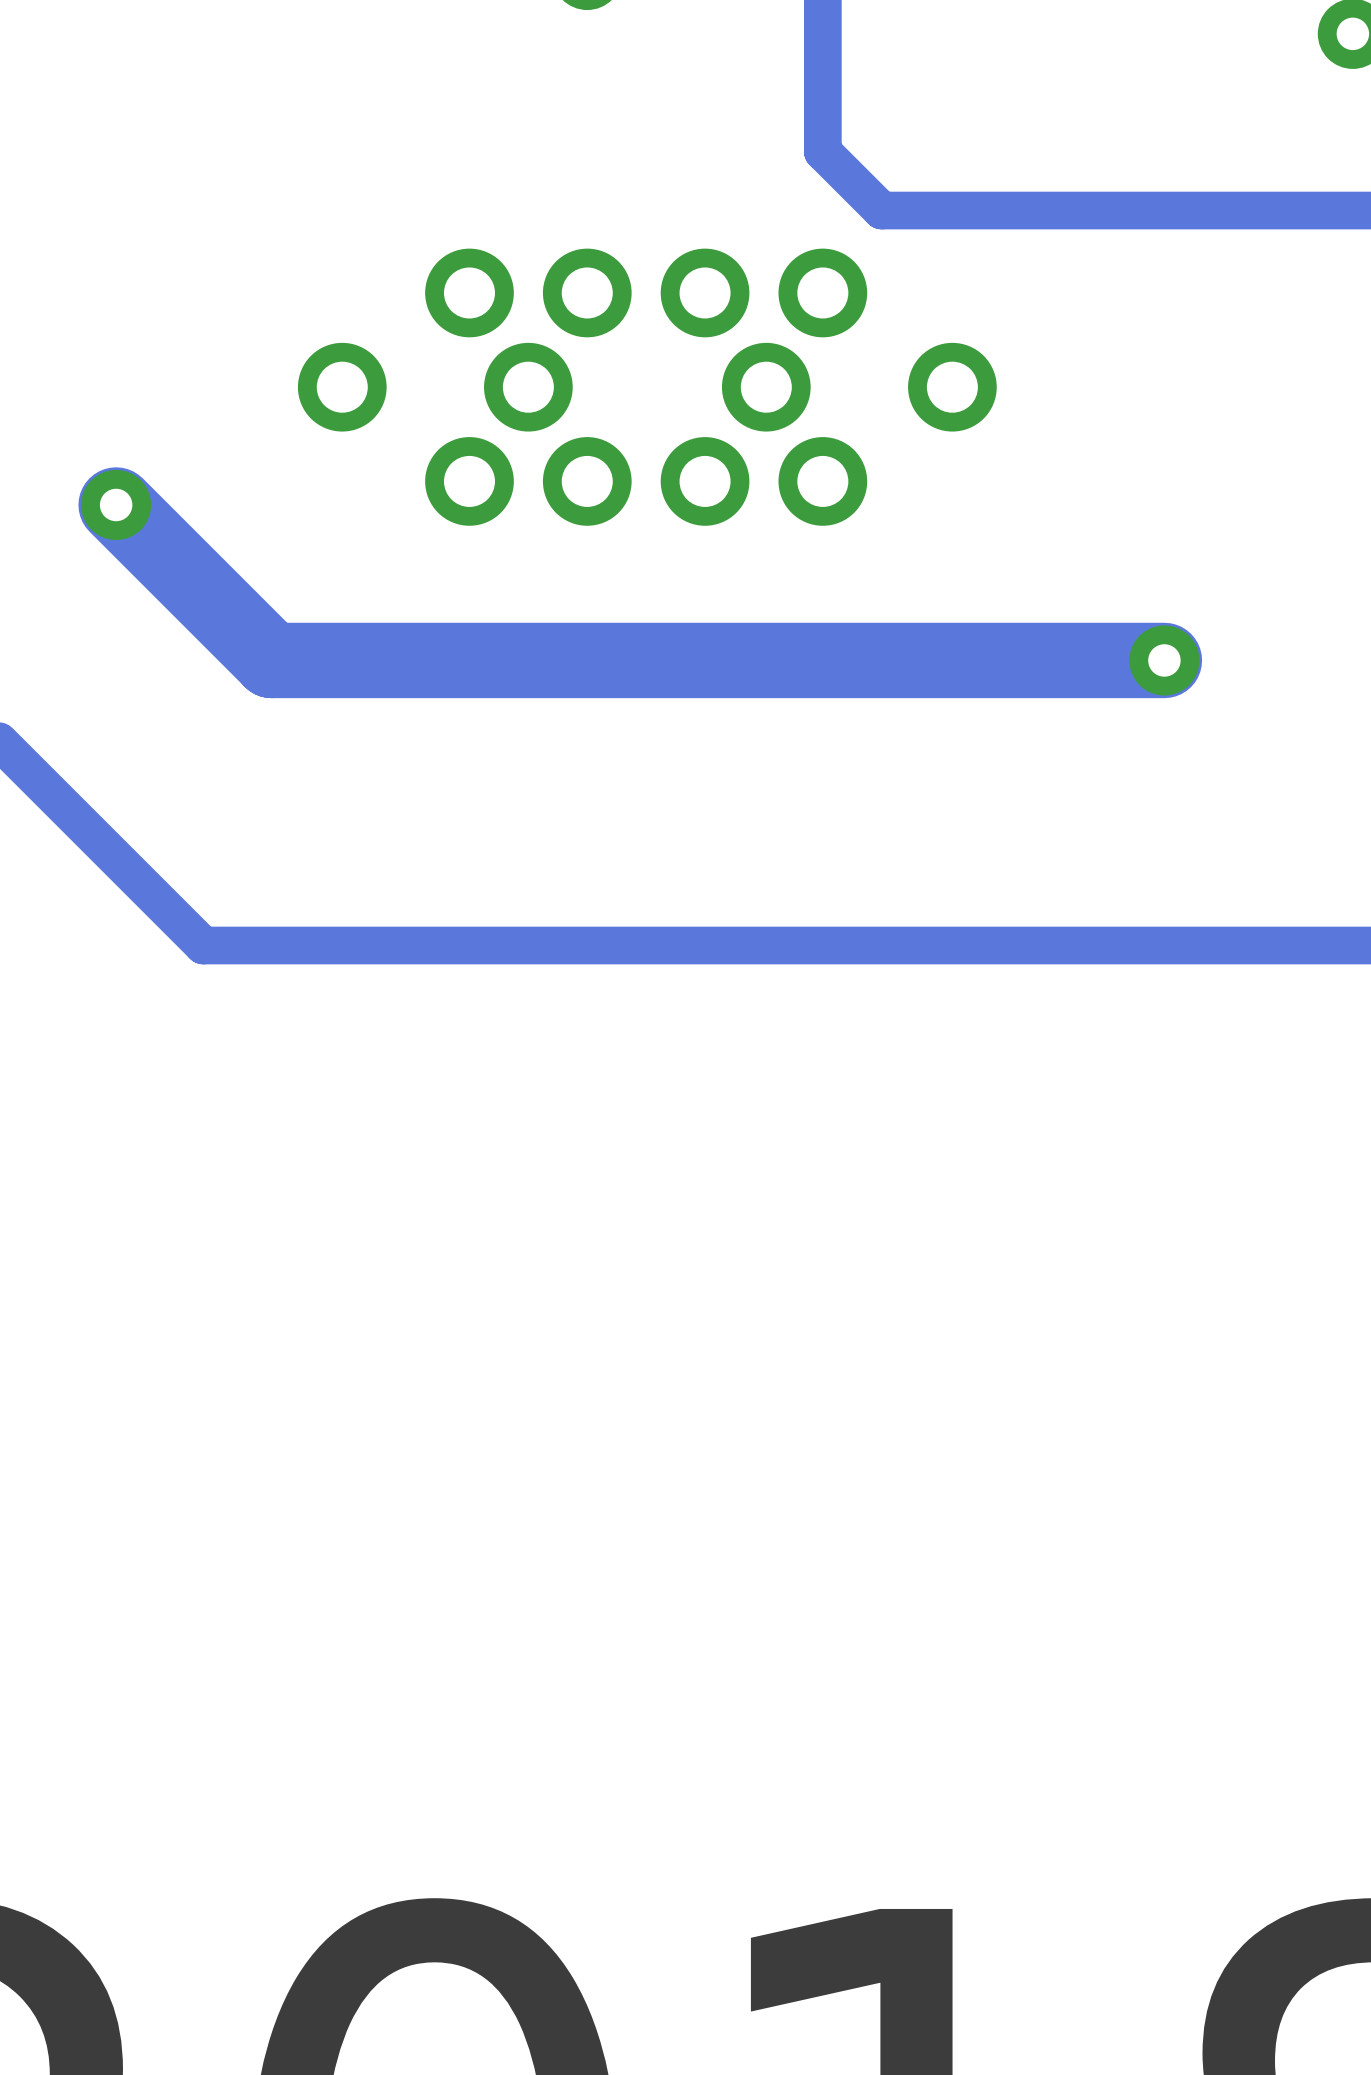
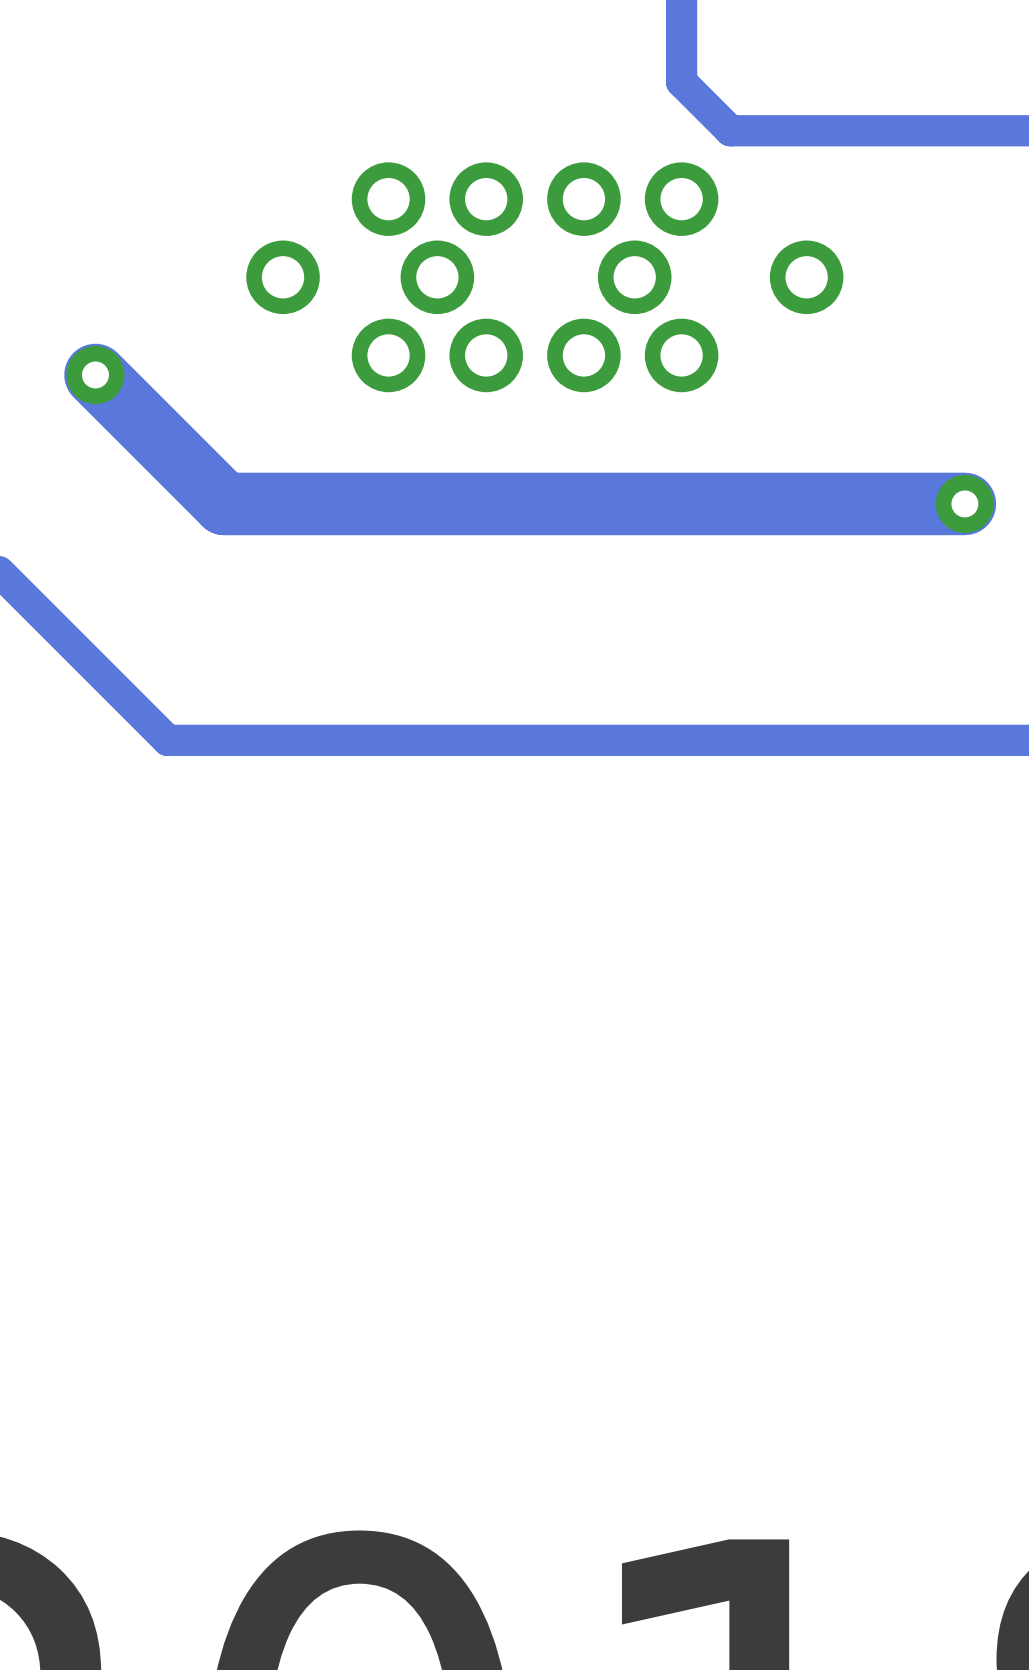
via position: (952, 387) -> (806, 277)

